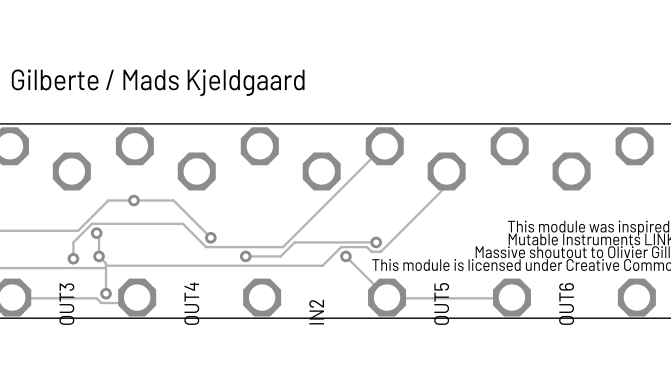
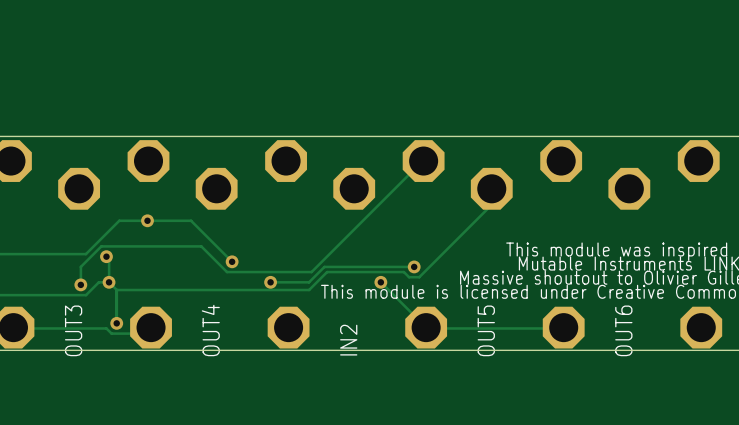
text: Gilberte / Mads Kjeldgaard (158, 82) -> none
track: (96, 233) (99, 235) (99, 256) -> (106, 256) (109, 259) (109, 282) (98, 282) (86, 295)
track: (341, 247) (322, 265) (106, 265) -> (375, 272) (327, 272) (309, 290) (116, 290) (116, 323)
track: (78, 268) (106, 268) -> none

